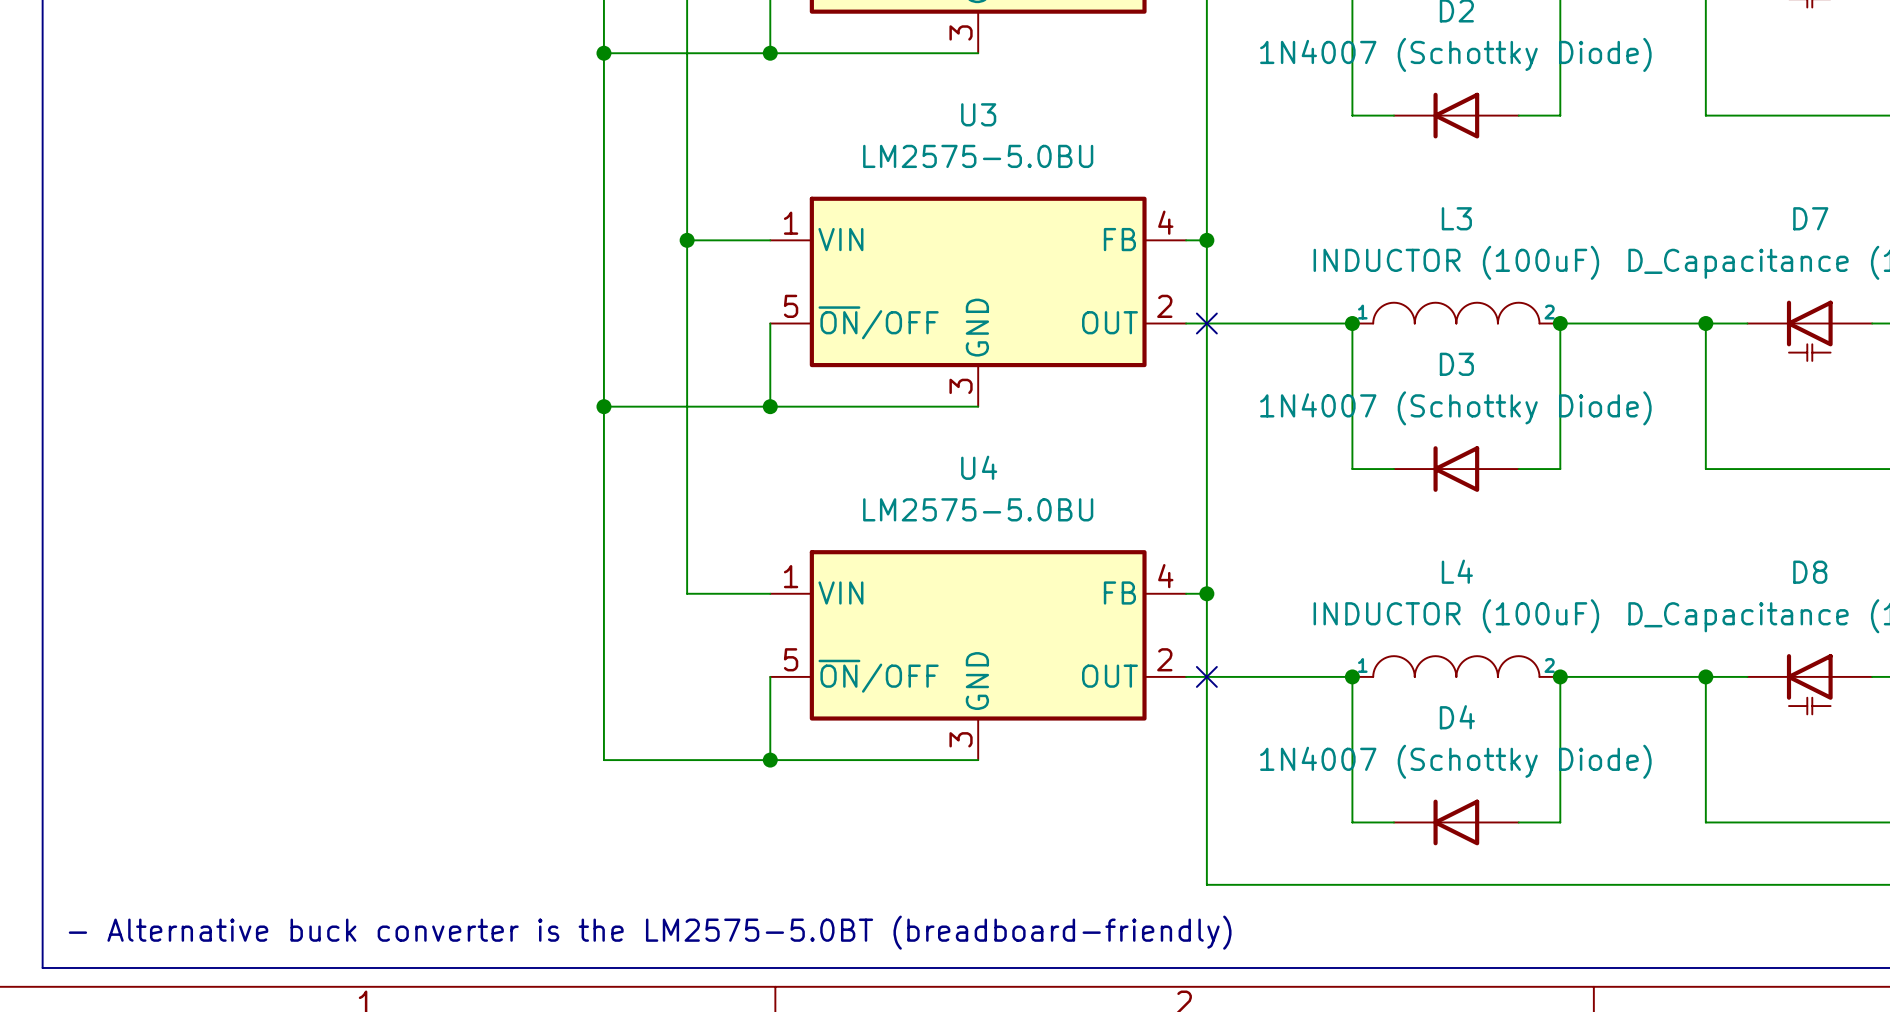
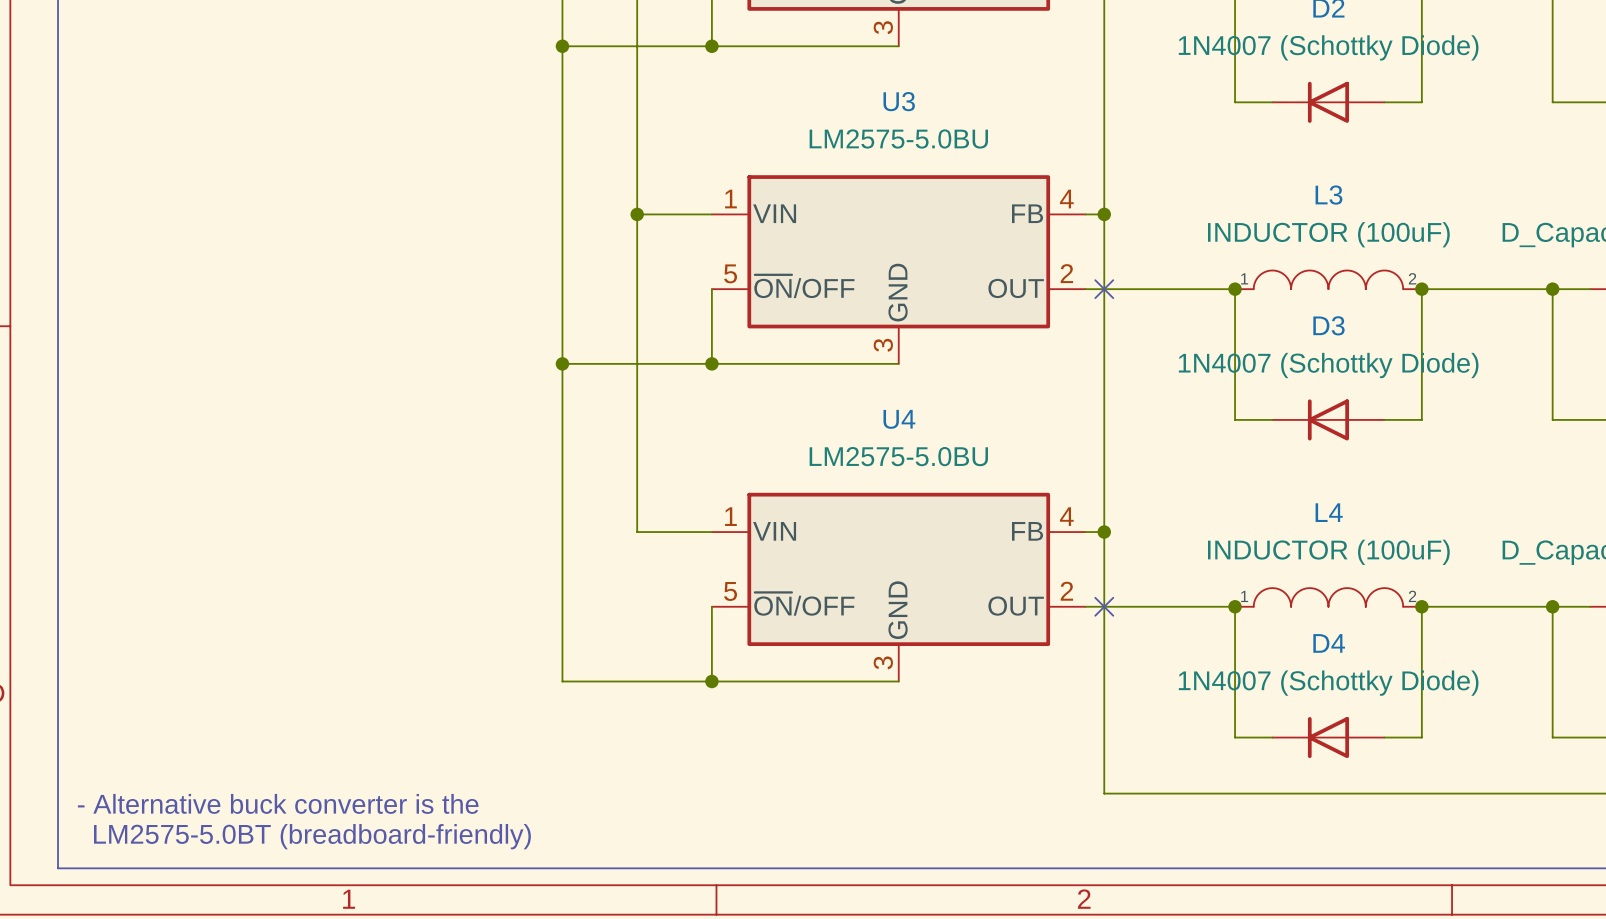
text: none -> - Alternative buck converter is the (278, 803)
text: - Alternative buck converter is the LM2575-5.0BT (breadboard-friendly) (650, 932) -> LM2575-5.0BT (breadboard-friendly) (312, 836)

